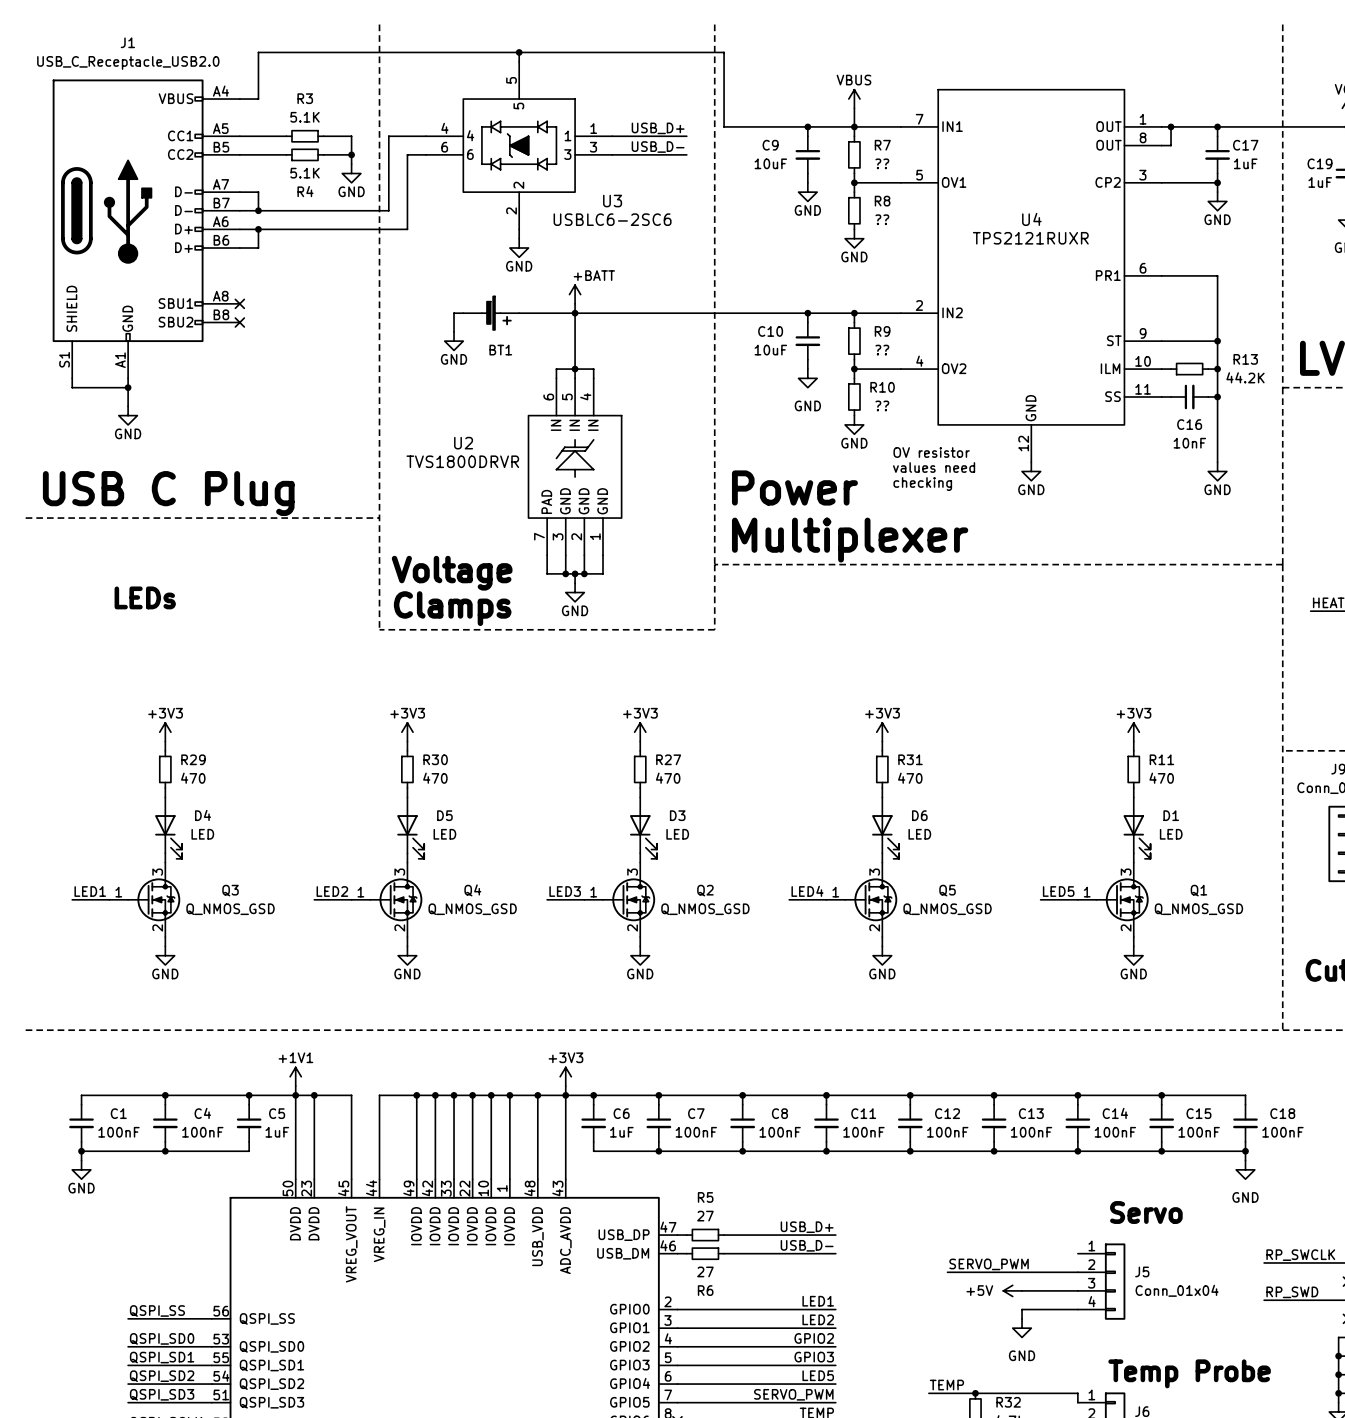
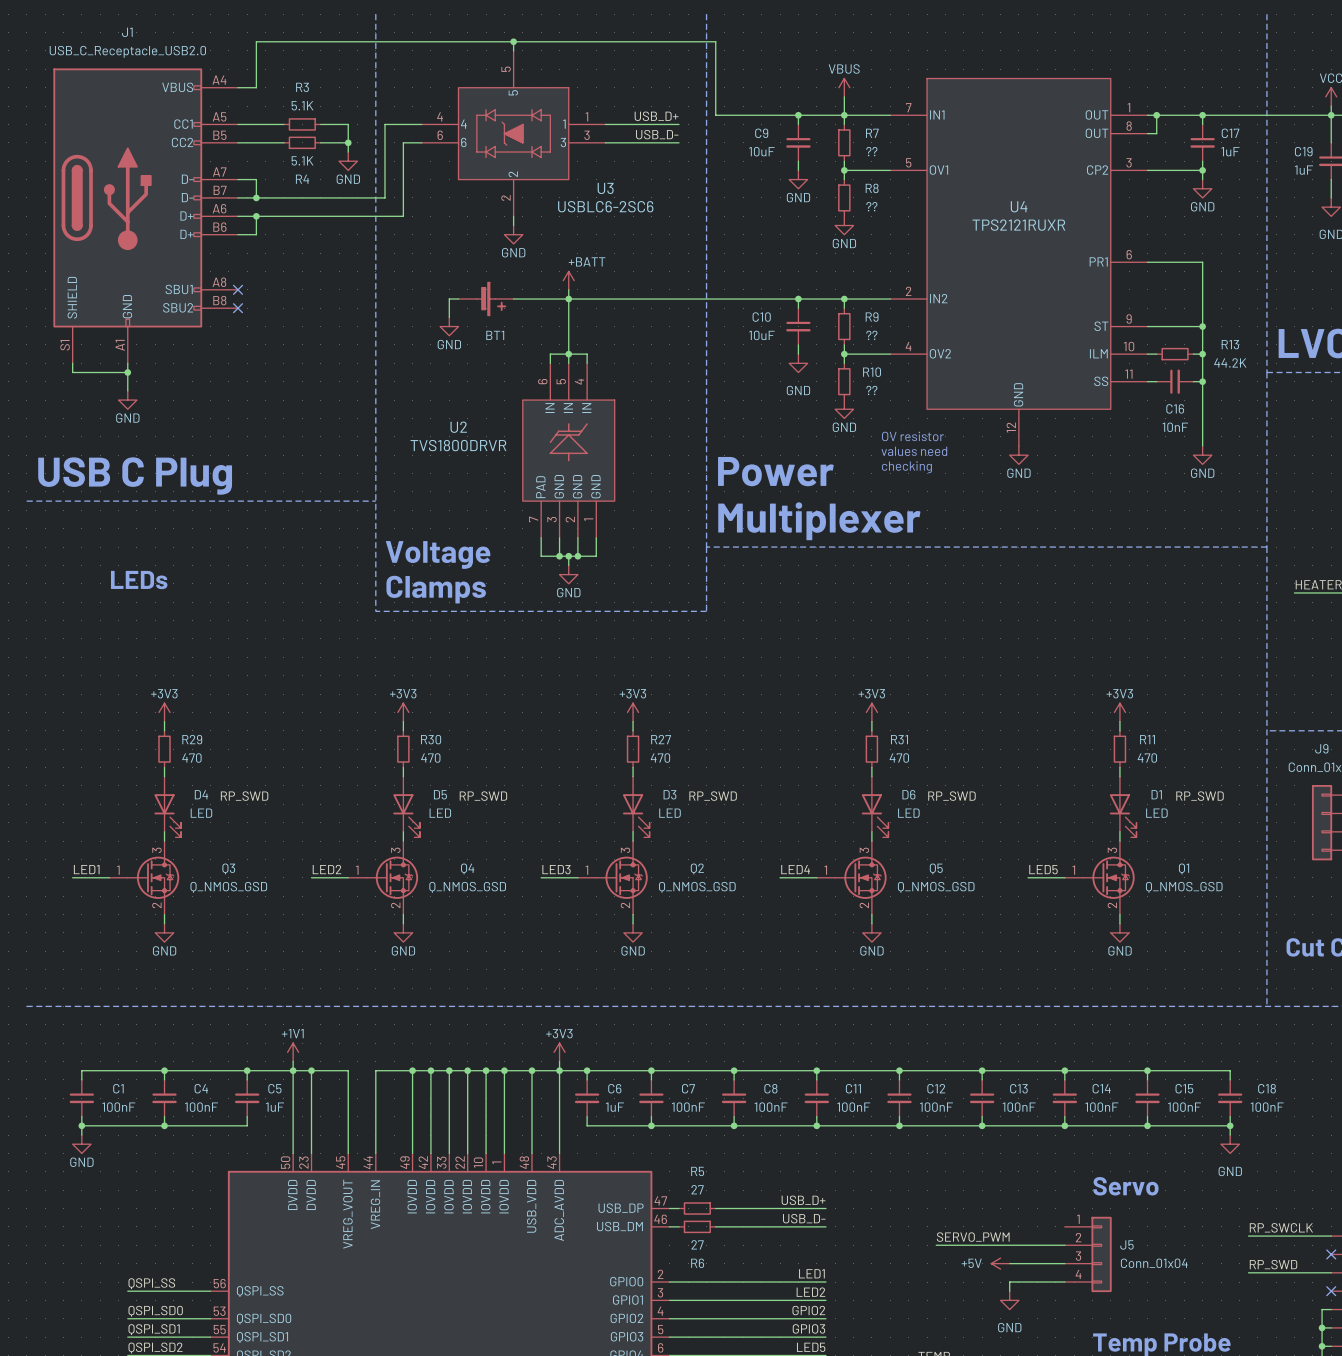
label: none -> RP_SWD (244, 796)
label: none -> RP_SWD (483, 796)
label: none -> RP_SWD (713, 796)
label: none -> RP_SWD (951, 796)
label: none -> RP_SWD (1200, 796)

